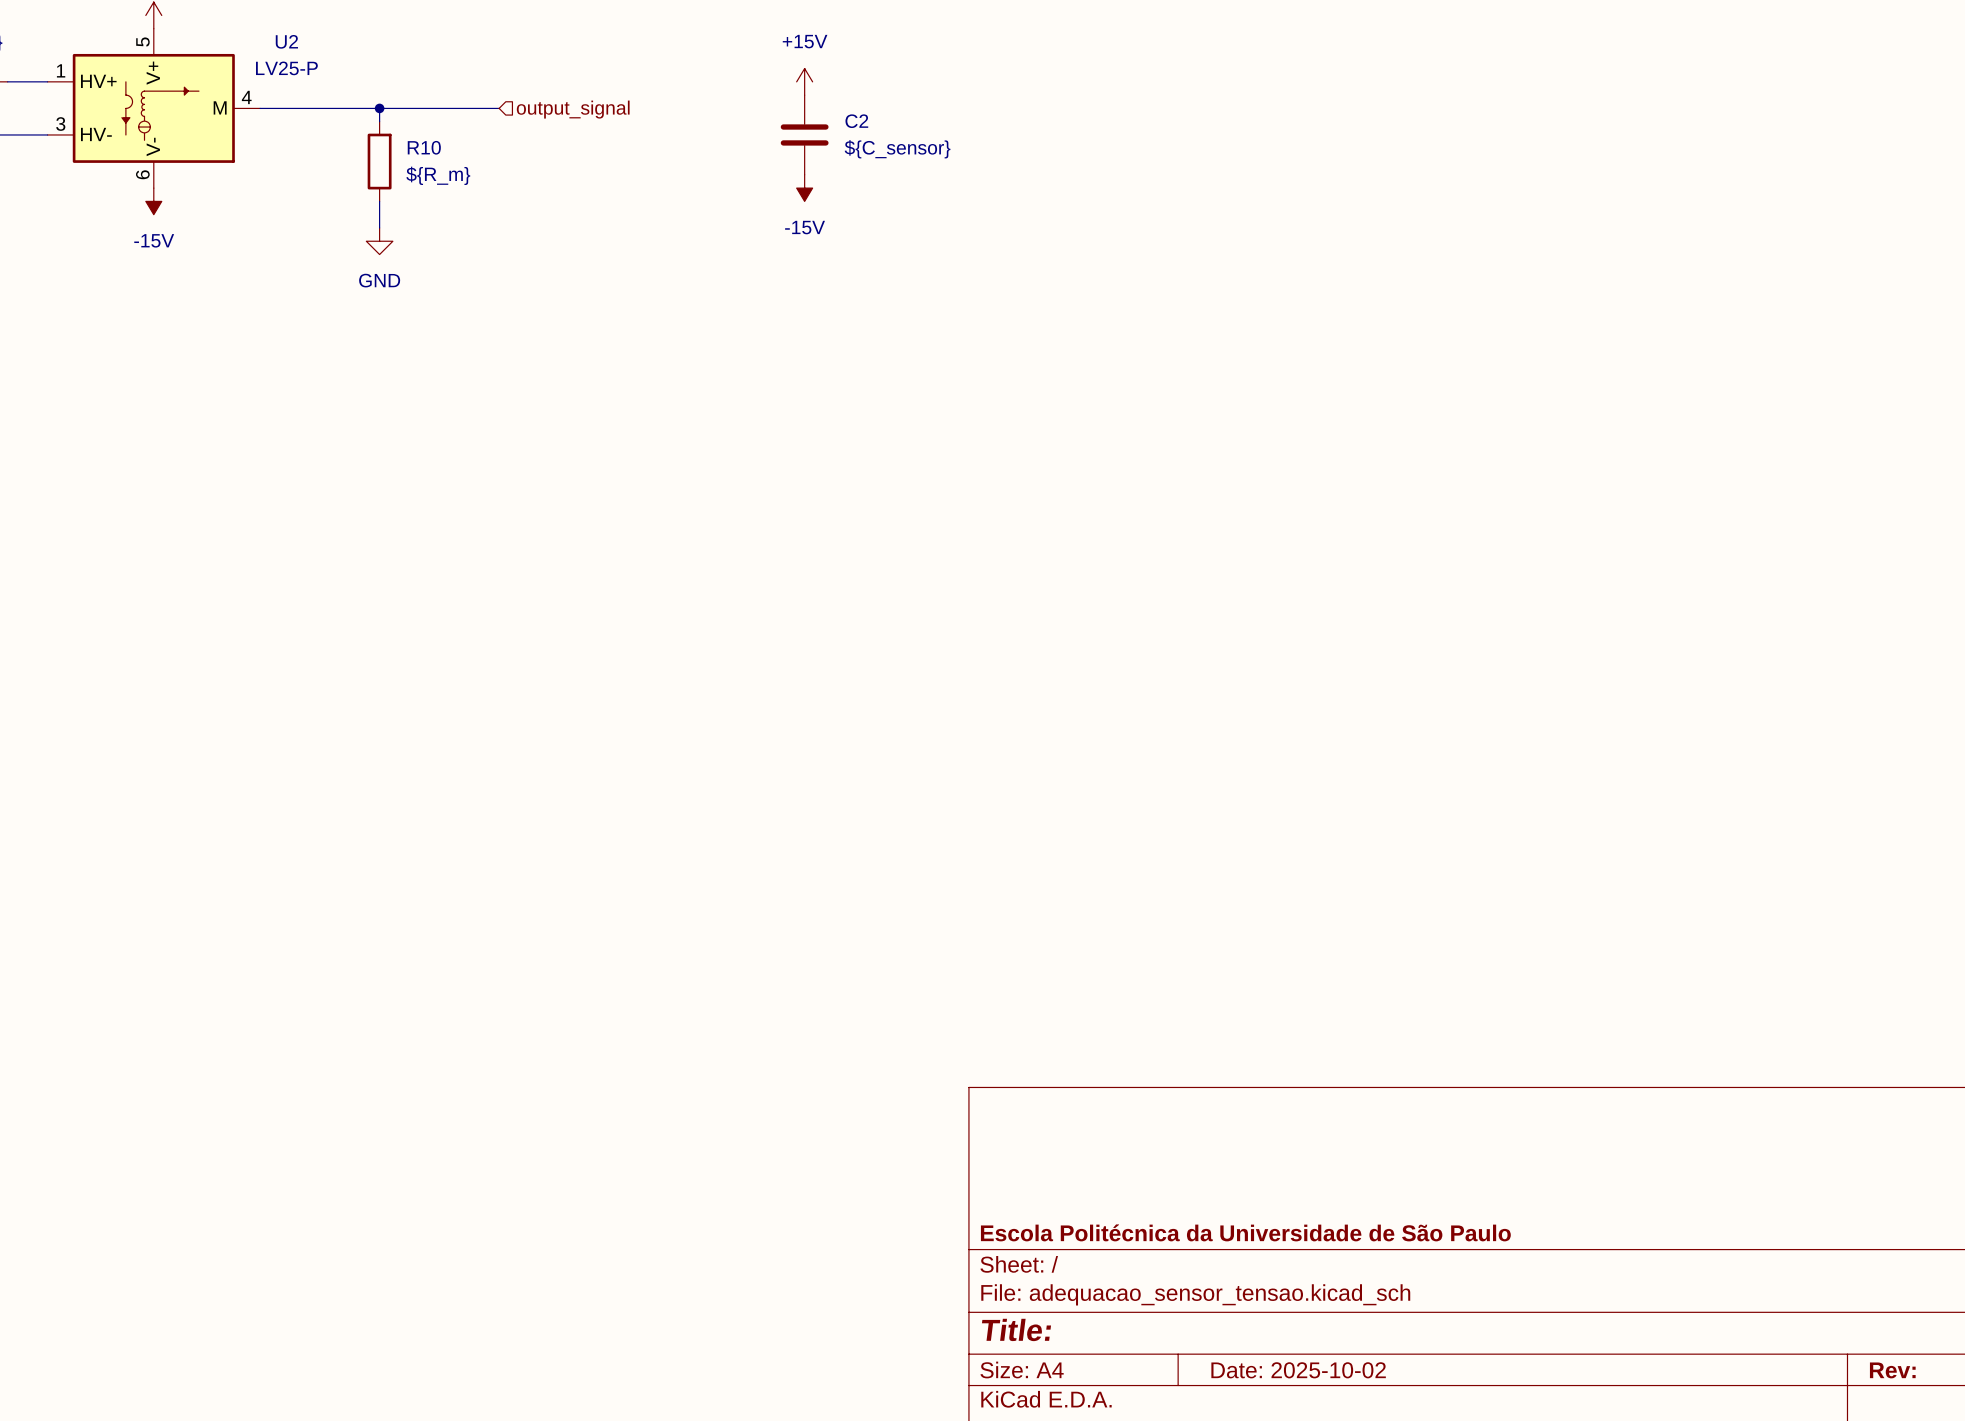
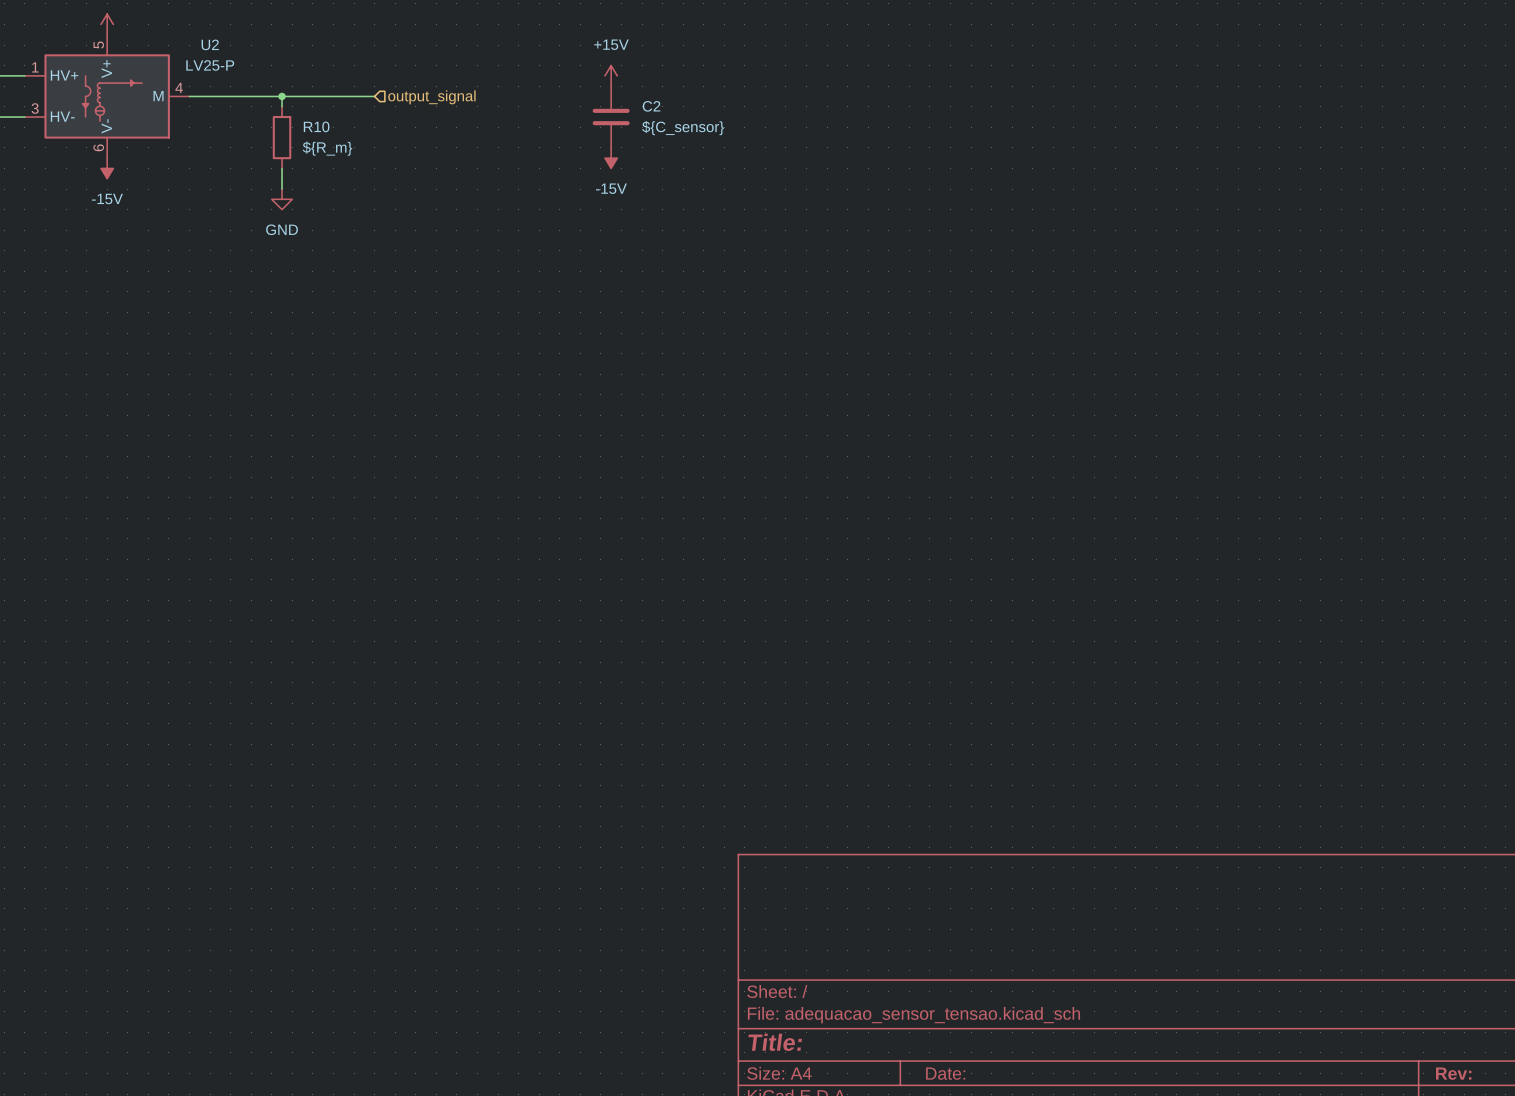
title block: Escola Politécnica da Universidade de São Paulo (1245, 1232) -> none
title block: Date: 2025-10-02 (1298, 1370) -> Date: (945, 1073)

